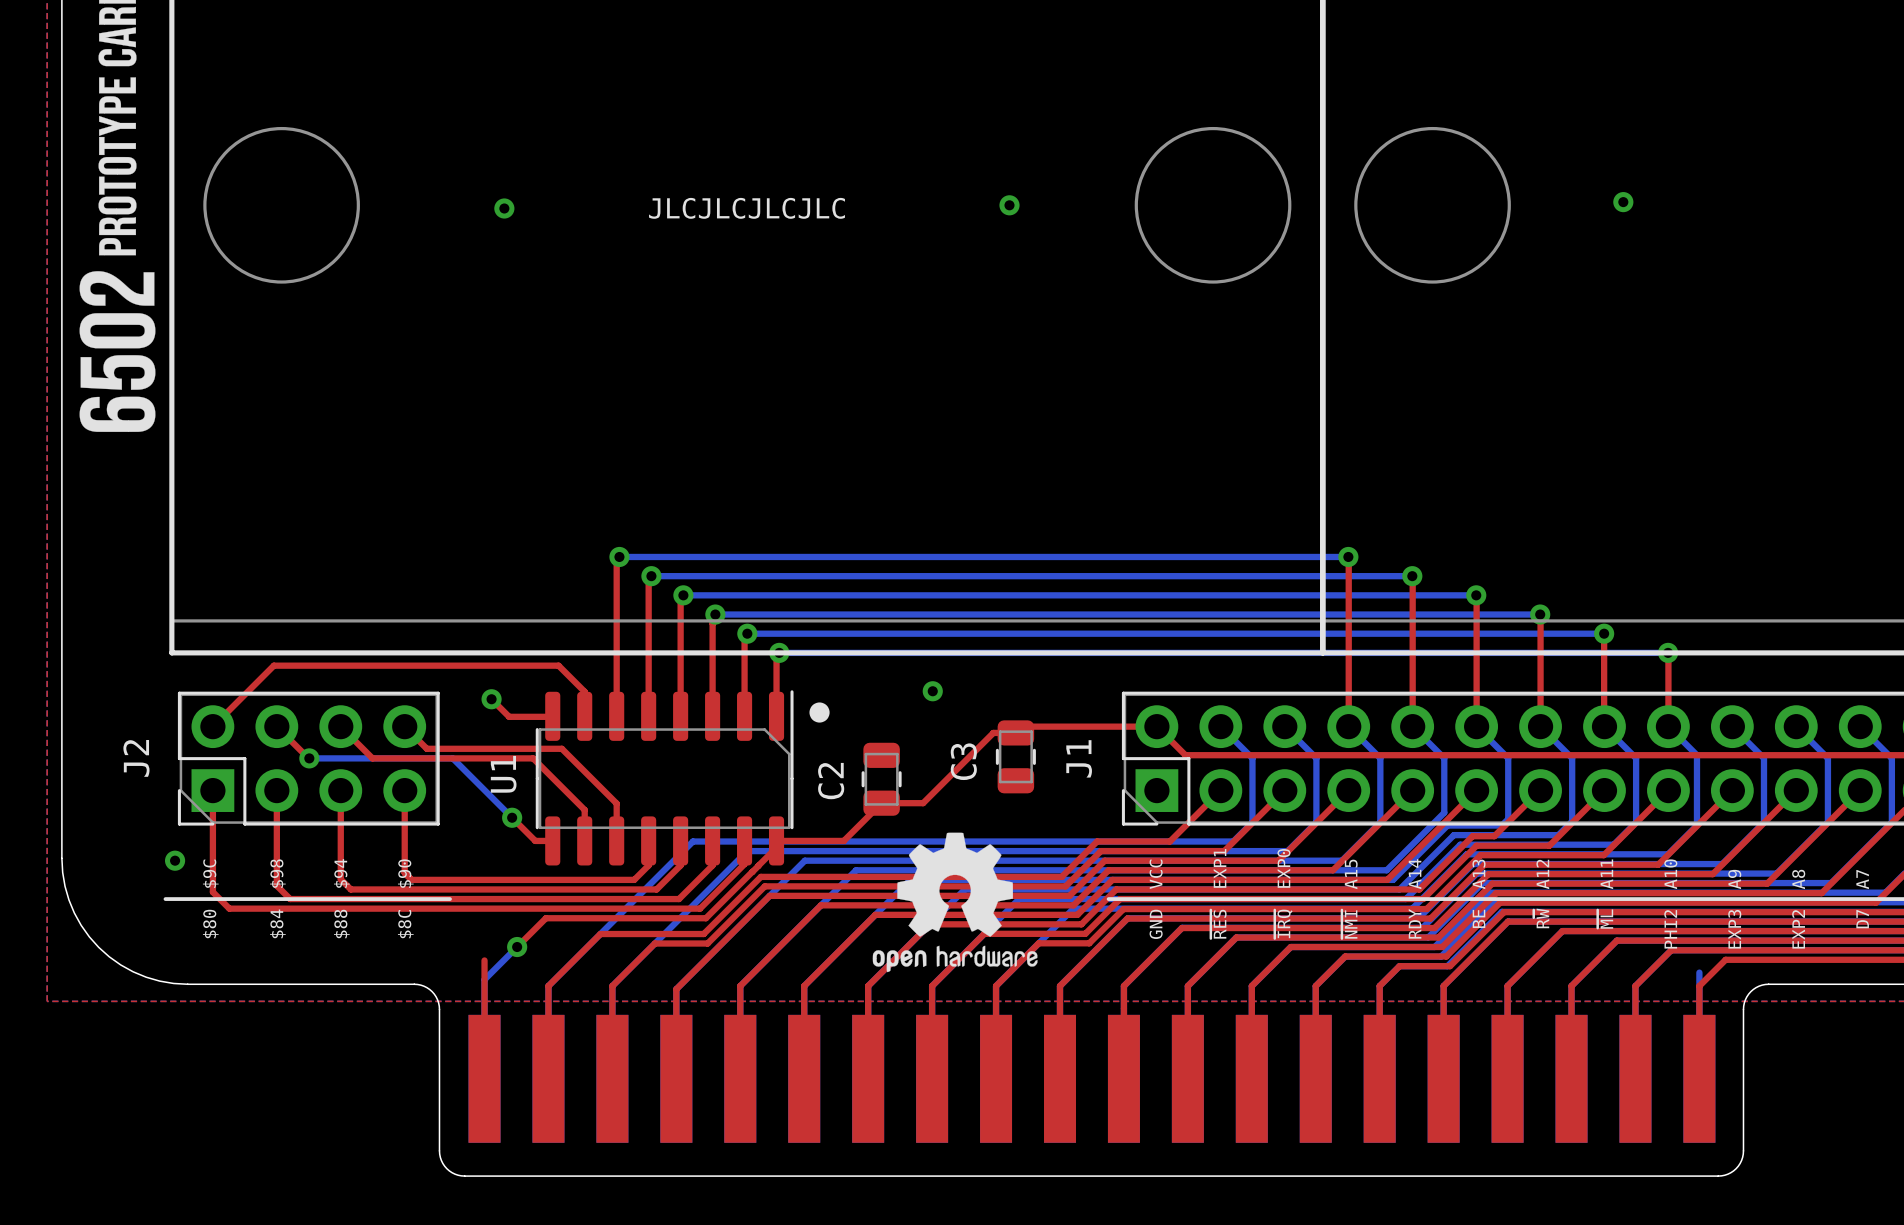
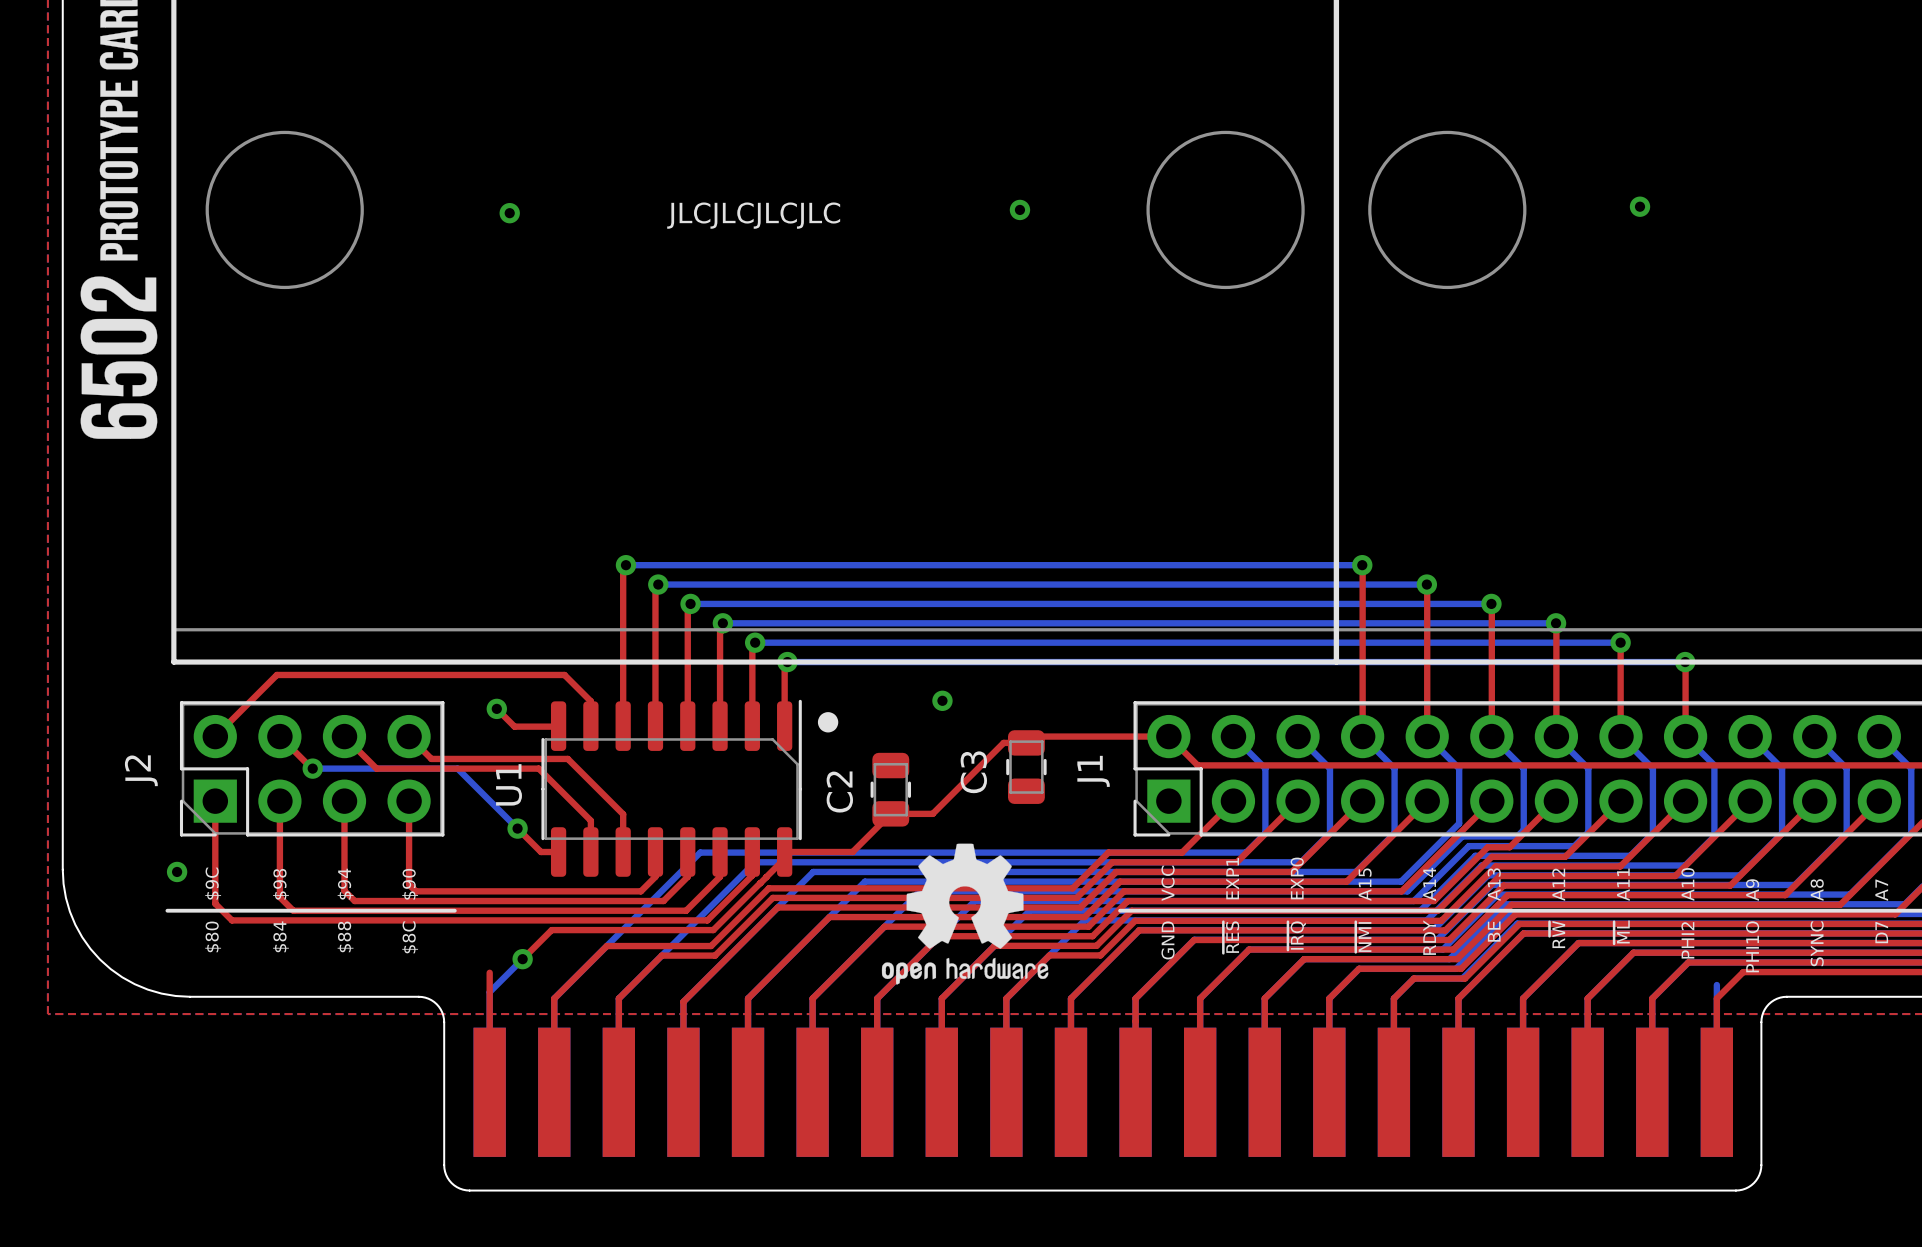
text: EXP3 (1734, 929) -> PHI1O (1752, 946)
text: EXP2 (1798, 929) -> SYNC (1817, 943)

